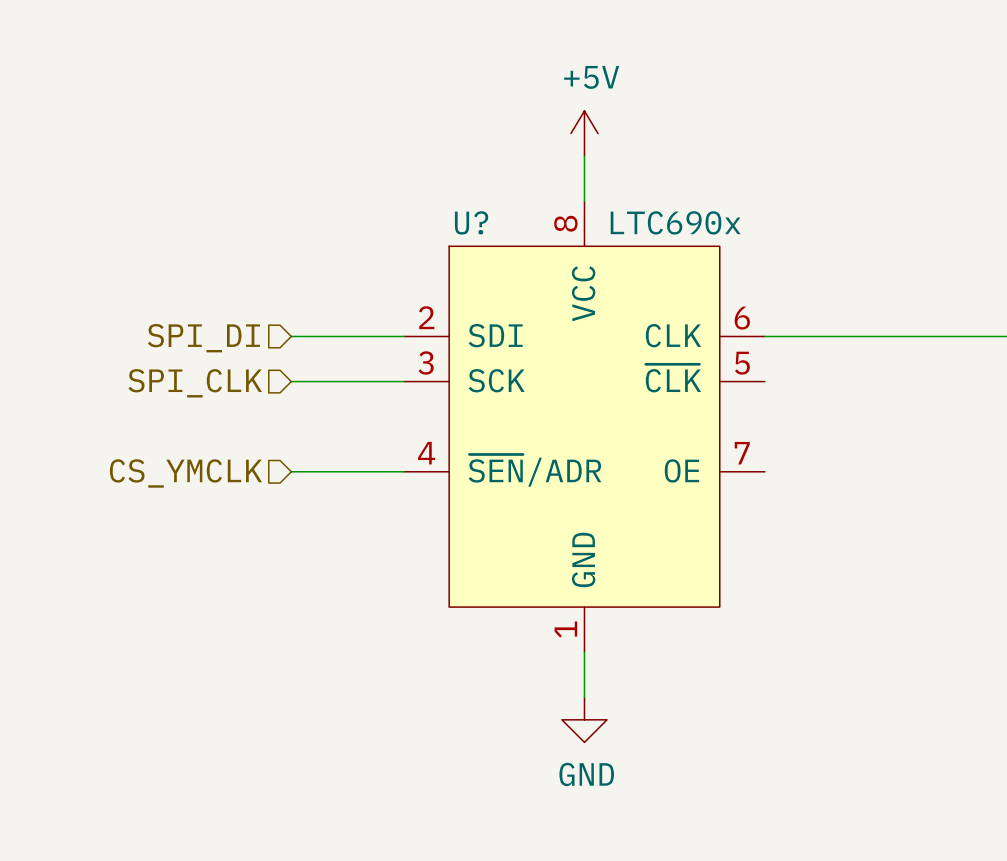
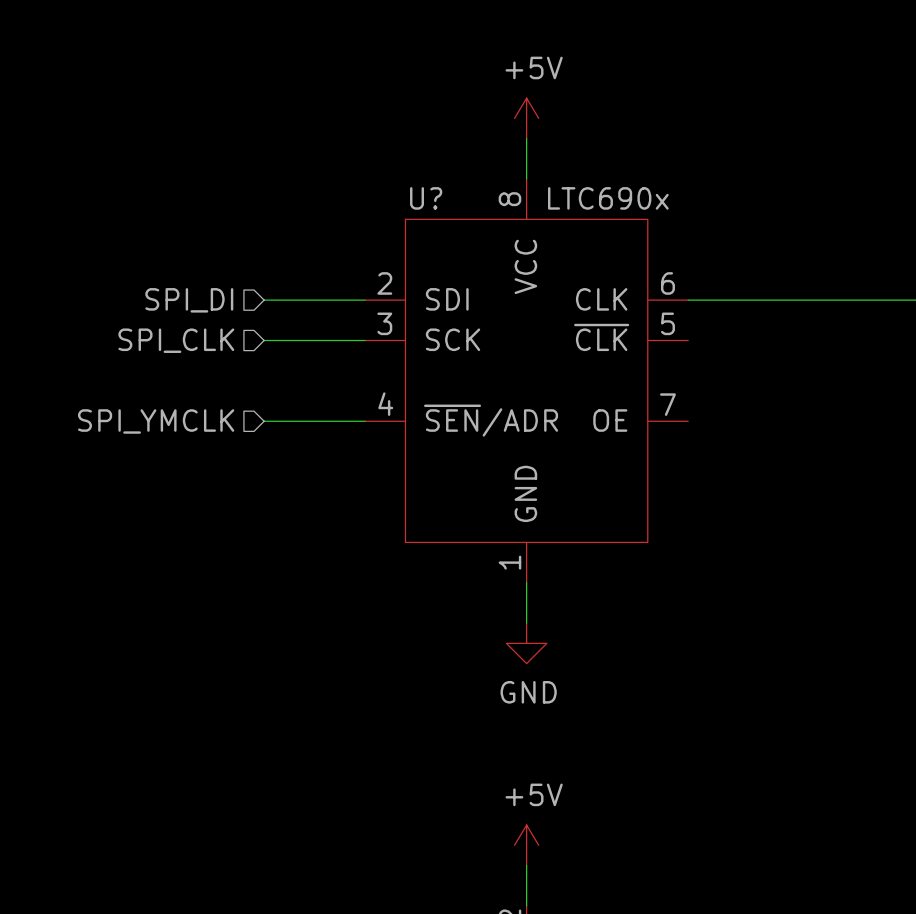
hierarchical label: CS_YMCLK (185, 473) -> SPI_YMCLK (156, 421)

